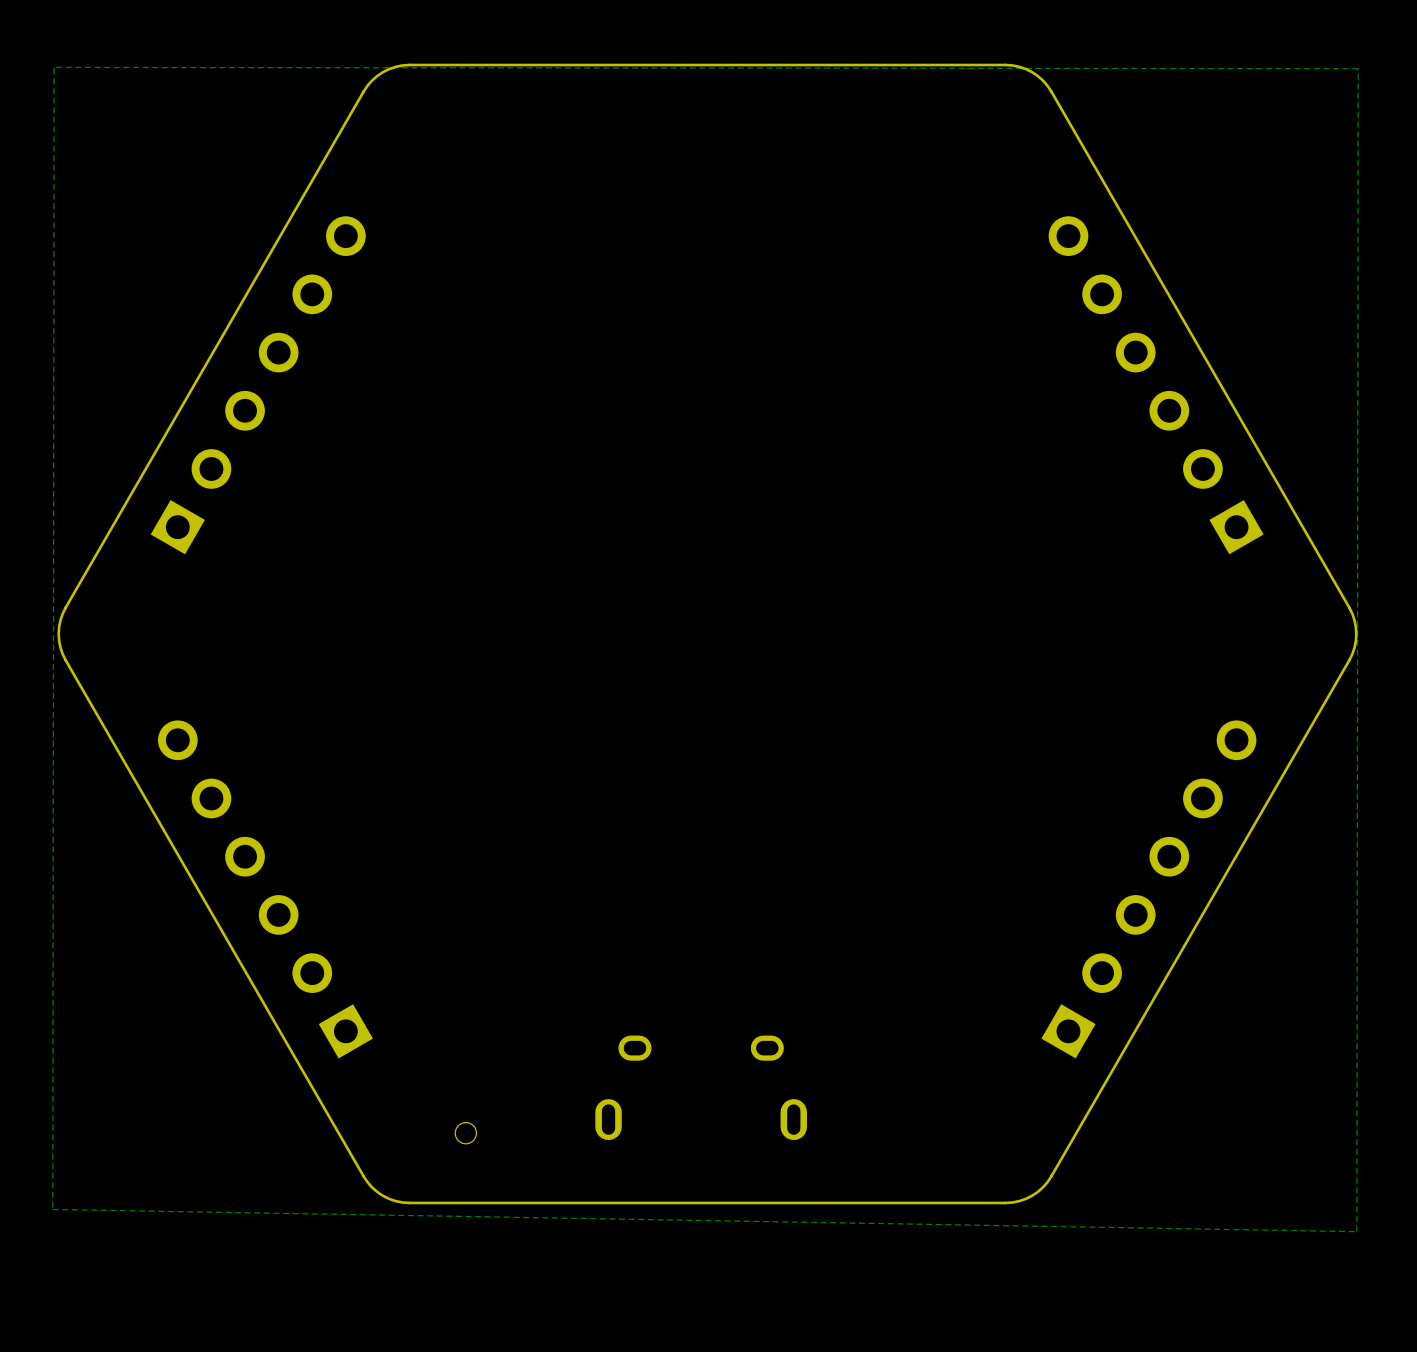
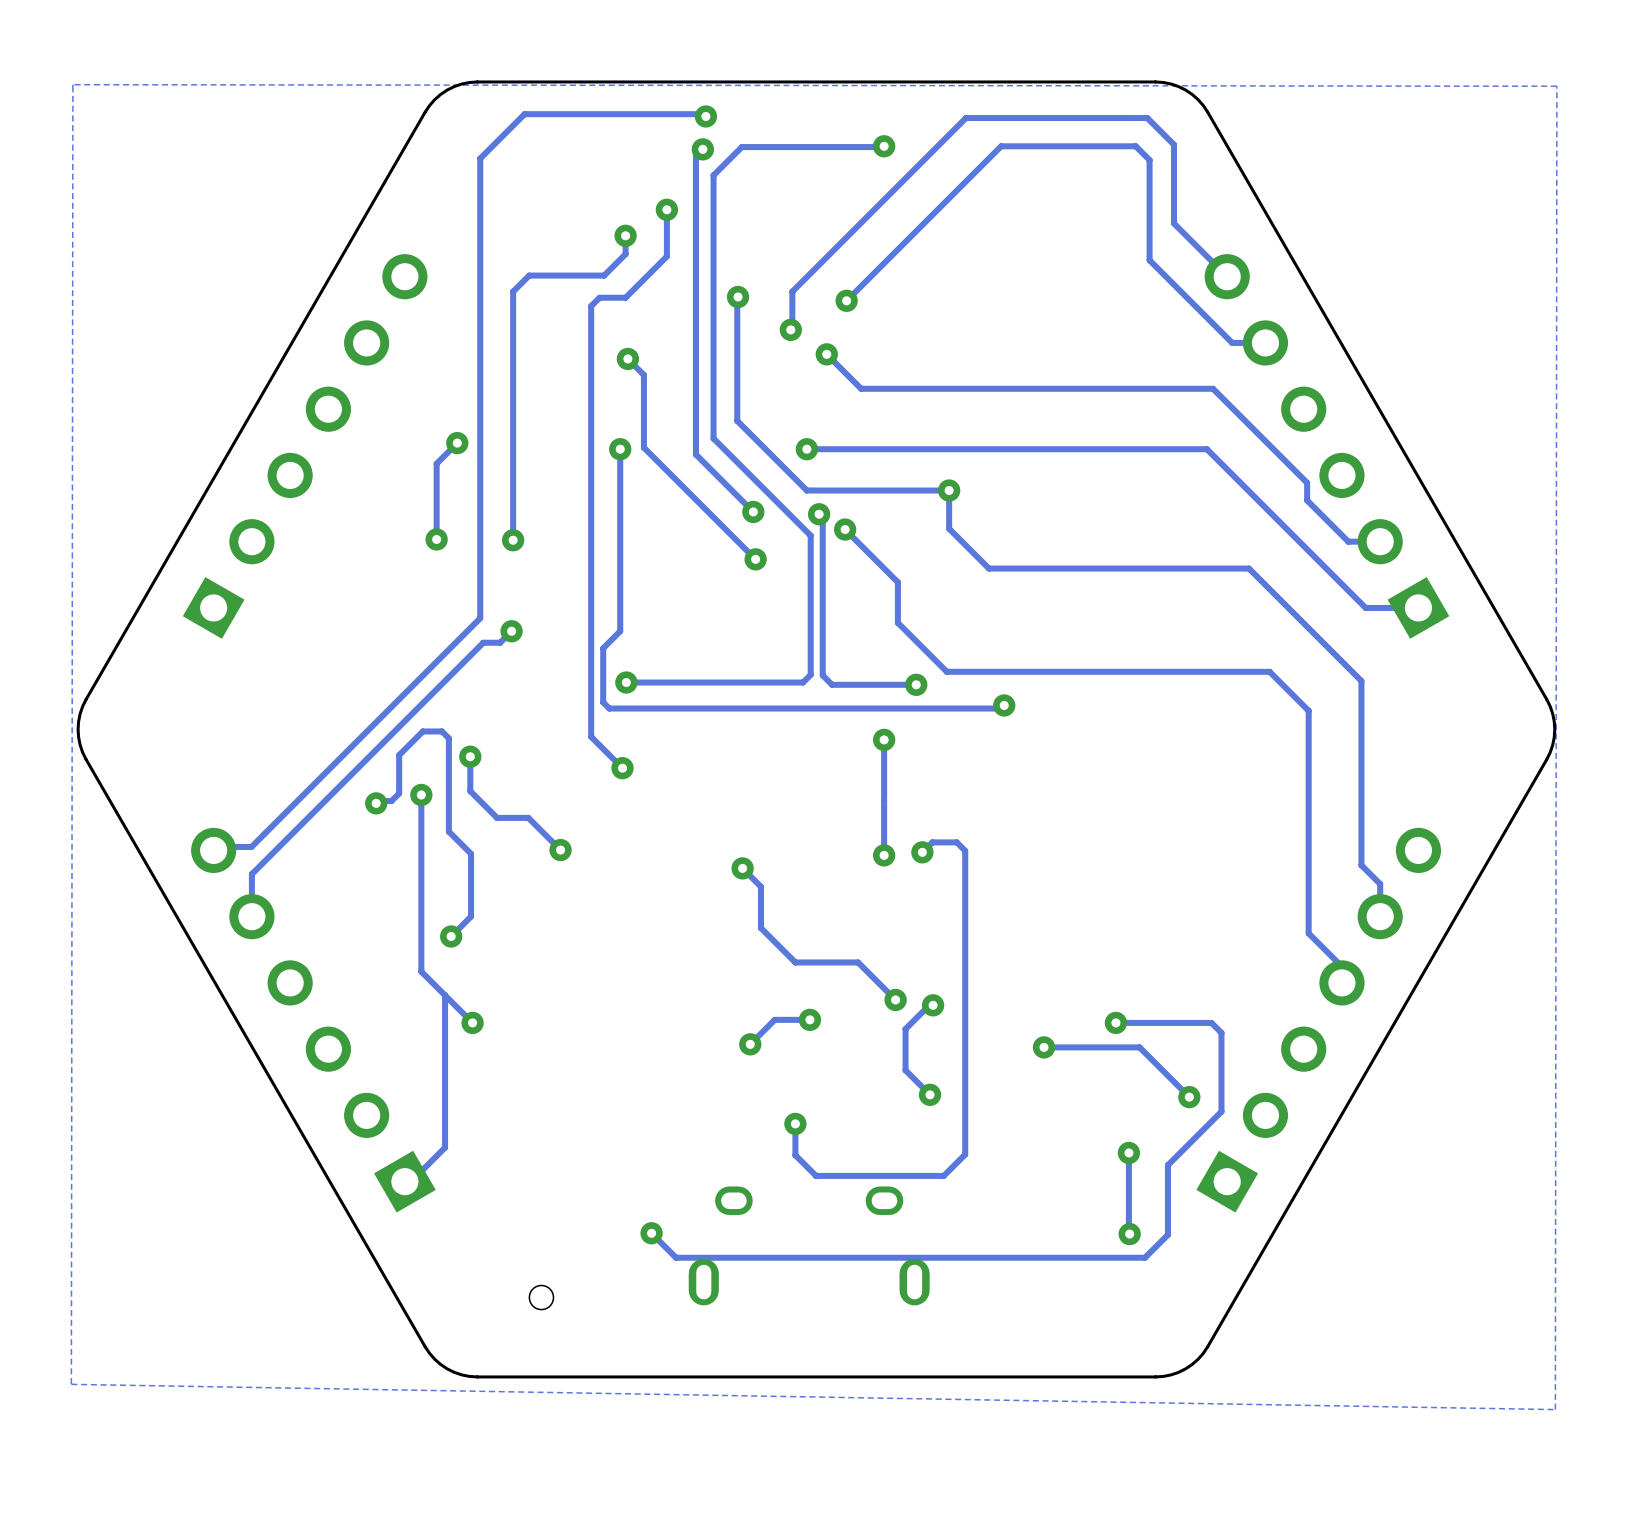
track: none -> (705, 116) (703, 114) (524, 114) (480, 158) (480, 618) (251, 846) (217, 846) (213, 850)
via: none -> (705, 116)
track: none -> (884, 146) (741, 147) (713, 175) (713, 438) (810, 535) (810, 674) (803, 682) (626, 682)
via: none -> (884, 146)
track: none -> (702, 149) (695, 156) (695, 454) (753, 511)
via: none -> (702, 149)
track: none -> (666, 209) (666, 256) (625, 297) (599, 297) (591, 306) (591, 736) (622, 768)
via: none -> (666, 209)
track: none -> (625, 235) (625, 254) (604, 275) (529, 275) (513, 291) (513, 540)
via: none -> (625, 235)
track: none -> (1227, 276) (1174, 223) (1174, 144) (1147, 117) (965, 117) (792, 291) (790, 329)
track: none -> (738, 296) (737, 420) (806, 490) (949, 490) (949, 528) (988, 568) (1249, 568) (1361, 680) (1361, 865) (1380, 884) (1380, 916)
via: none -> (738, 296)
track: none -> (846, 300) (1001, 146) (1135, 146) (1149, 160) (1149, 260) (1232, 342) (1265, 342)
via: none -> (846, 300)
via: none -> (790, 329)
track: none -> (826, 354) (861, 388) (1213, 388) (1307, 482) (1307, 500) (1348, 541) (1380, 541)
via: none -> (826, 354)
track: none -> (627, 358) (643, 375) (643, 447) (755, 559)
via: none -> (627, 358)
track: none -> (457, 443) (436, 463) (436, 539)
via: none -> (457, 443)
track: none -> (620, 449) (620, 631) (603, 648) (603, 702) (609, 708) (1001, 708) (1004, 705)
via: none -> (620, 449)
track: none -> (806, 449) (1206, 449) (1365, 607) (1418, 607)
via: none -> (806, 449)
via: none -> (949, 490)
via: none -> (753, 511)
track: none -> (819, 514) (822, 517) (822, 675) (832, 684) (916, 684)
via: none -> (819, 514)
track: none -> (845, 529) (897, 582) (897, 622) (946, 671) (1269, 671) (1308, 710) (1308, 933) (1341, 966) (1341, 982)
via: none -> (845, 529)
via: none -> (436, 539)
via: none -> (513, 540)
via: none -> (755, 559)
track: none -> (511, 631) (500, 642) (483, 642) (251, 874) (251, 916)
via: none -> (511, 631)
via: none -> (626, 682)
via: none -> (916, 684)
via: none -> (1004, 705)
track: none -> (884, 739) (884, 855)
via: none -> (884, 739)
track: none -> (470, 756) (470, 791) (497, 817) (528, 817) (560, 850)
via: none -> (470, 756)
via: none -> (622, 768)
track: none -> (421, 794) (421, 971) (472, 1022)
via: none -> (421, 794)
track: none -> (376, 803) (378, 801) (391, 801) (399, 793) (399, 755) (422, 731) (441, 731) (448, 738) (448, 831) (471, 853) (471, 916) (451, 936)
via: none -> (376, 803)
via: none -> (560, 850)
track: none -> (922, 852) (932, 842) (956, 842) (965, 850) (965, 1154) (943, 1175) (816, 1175) (795, 1155) (795, 1123)
via: none -> (922, 852)
via: none -> (884, 855)
track: none -> (742, 868) (760, 886) (760, 928) (795, 962) (858, 962) (895, 999)
via: none -> (742, 868)
via: none -> (451, 936)
track: none -> (445, 995) (445, 1147) (411, 1181) (404, 1181)
via: none -> (895, 999)
track: none -> (933, 1005) (929, 1005) (905, 1029) (905, 1070) (930, 1094)
via: none -> (933, 1005)
track: none -> (809, 1019) (774, 1019) (750, 1044)
via: none -> (809, 1019)
via: none -> (472, 1022)
track: none -> (1115, 1022) (1211, 1022) (1221, 1032) (1221, 1111) (1167, 1165) (1167, 1234) (1144, 1257) (676, 1257) (651, 1233)
via: none -> (1115, 1022)
via: none -> (750, 1044)
track: none -> (1044, 1047) (1139, 1047) (1189, 1097)
via: none -> (1044, 1047)
via: none -> (930, 1094)
via: none -> (1189, 1097)
via: none -> (795, 1123)
track: none -> (1128, 1152) (1129, 1234)
via: none -> (1128, 1152)
via: none -> (651, 1233)
via: none -> (1129, 1234)

